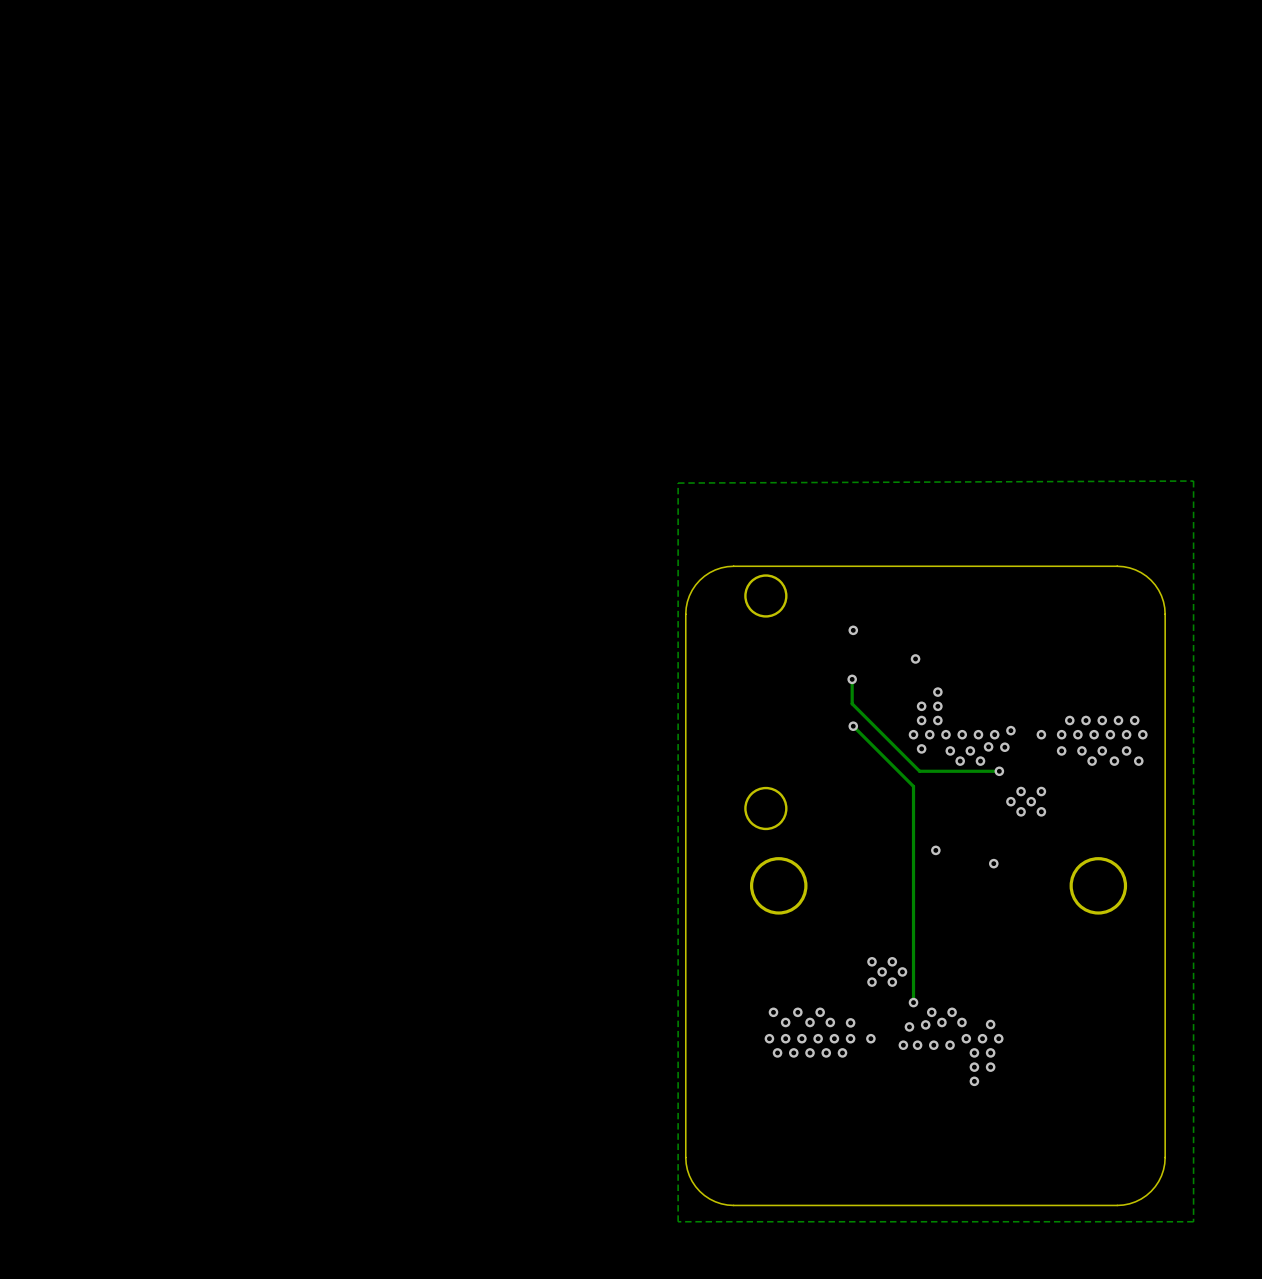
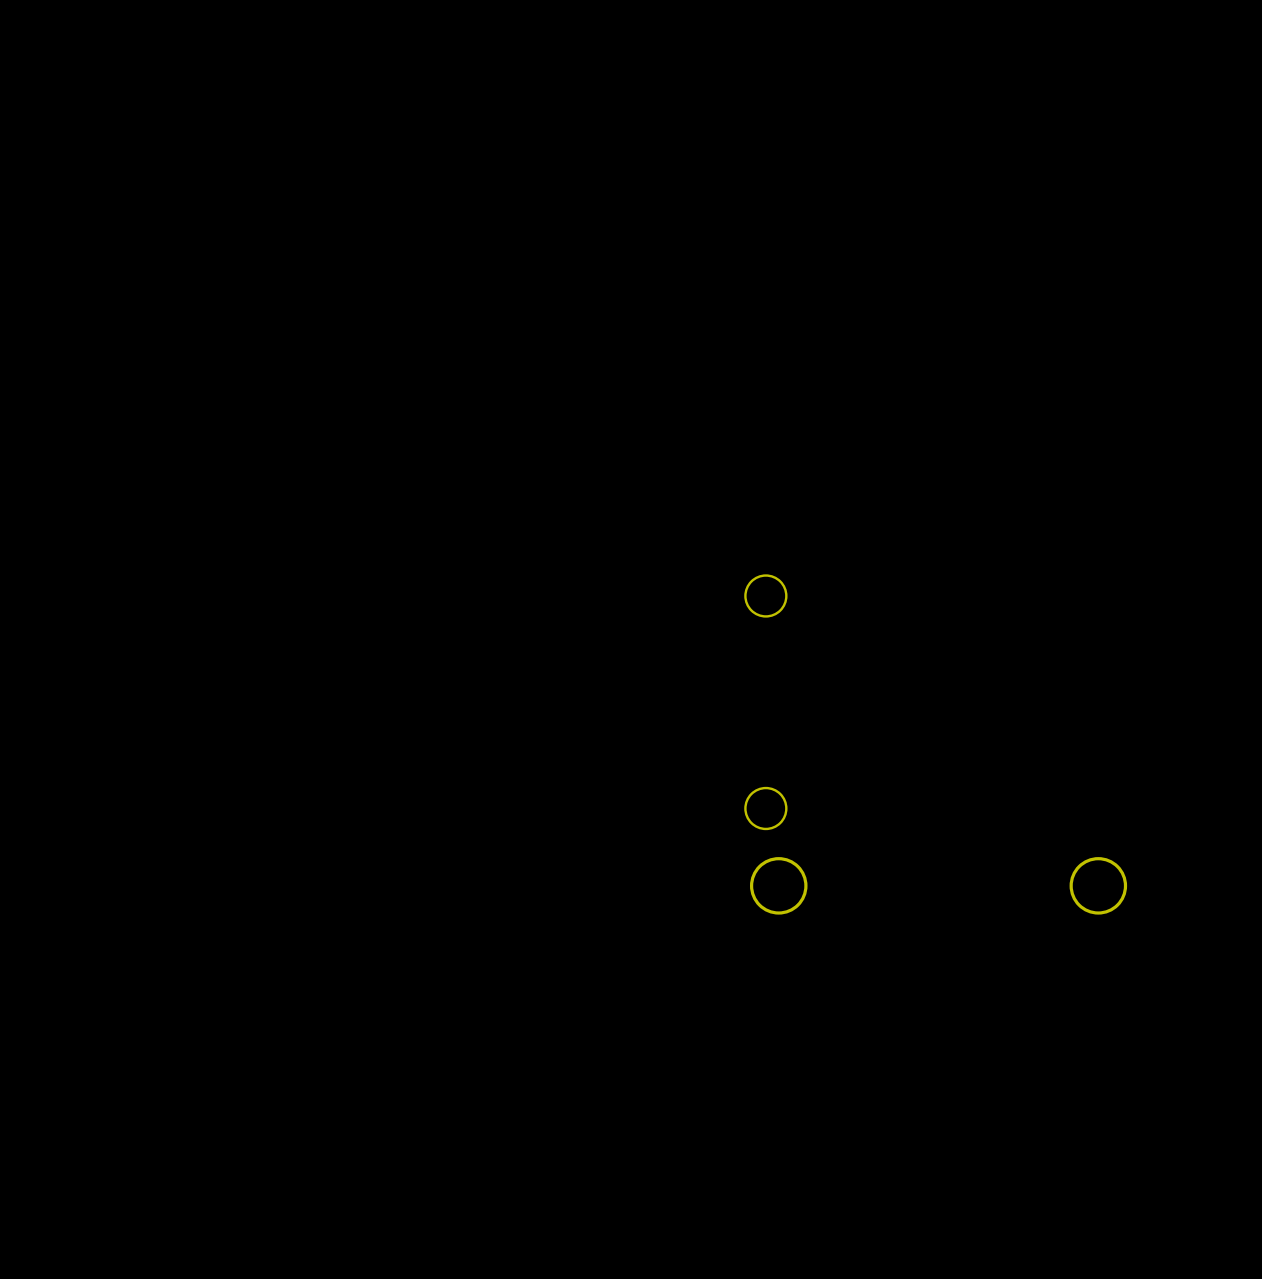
zone outline: (1193, 481) (1193, 1221) (678, 1221) (678, 483) (1193, 481) -> none
board edge: (1117, 566) (733, 566) (721, 567) (709, 572) (699, 580) (692, 590) (687, 601) (685, 614) (685, 1157) (687, 1169) (692, 1181) (699, 1191) (709, 1199) (721, 1203) (733, 1205) (1117, 1205) (1129, 1203) (1141, 1199) (1151, 1191) (1158, 1181) (1163, 1169) (1165, 1157) (1164, 607) (1158, 590) (1146, 576) (1129, 567) (1117, 566) -> none
via: (853, 630) -> none
via: (915, 658) -> none
track: (852, 679) (852, 703) (919, 771) (999, 771) -> none
via: (852, 679) -> none
via: (937, 692) -> none
via: (921, 706) -> none
via: (937, 706) -> none
via: (921, 720) -> none
via: (937, 720) -> none
via: (1069, 720) -> none
via: (1086, 720) -> none
via: (1102, 720) -> none
via: (1118, 720) -> none
via: (1134, 720) -> none
track: (853, 726) (913, 786) (913, 1002) -> none
via: (853, 726) -> none
via: (1010, 730) -> none
via: (913, 734) -> none
via: (929, 734) -> none
via: (945, 734) -> none
via: (962, 734) -> none
via: (978, 734) -> none
via: (994, 734) -> none
via: (1041, 734) -> none
via: (1061, 734) -> none
via: (1077, 734) -> none
via: (1094, 734) -> none
via: (1110, 734) -> none
via: (1126, 734) -> none
via: (1142, 734) -> none
via: (988, 746) -> none
via: (1004, 747) -> none
via: (921, 748) -> none
via: (950, 750) -> none
via: (970, 750) -> none
via: (1061, 750) -> none
via: (1081, 750) -> none
via: (1102, 750) -> none
via: (1126, 750) -> none
via: (960, 761) -> none
via: (980, 761) -> none
via: (1092, 761) -> none
via: (1114, 761) -> none
via: (1138, 761) -> none
via: (999, 771) -> none
via: (1021, 791) -> none
via: (1041, 791) -> none
via: (1010, 801) -> none
via: (1031, 801) -> none
via: (1021, 811) -> none
via: (1041, 811) -> none
via: (935, 850) -> none
via: (993, 863) -> none
via: (872, 961) -> none
via: (892, 961) -> none
via: (882, 971) -> none
via: (902, 971) -> none
via: (872, 982) -> none
via: (892, 982) -> none
via: (913, 1002) -> none
via: (773, 1012) -> none
via: (797, 1012) -> none
via: (820, 1012) -> none
via: (931, 1012) -> none
via: (952, 1012) -> none
via: (785, 1022) -> none
via: (810, 1022) -> none
via: (830, 1022) -> none
via: (850, 1022) -> none
via: (941, 1022) -> none
via: (961, 1022) -> none
via: (925, 1024) -> none
via: (990, 1024) -> none
via: (909, 1026) -> none
via: (769, 1038) -> none
via: (785, 1038) -> none
via: (801, 1038) -> none
via: (818, 1038) -> none
via: (834, 1038) -> none
via: (850, 1038) -> none
via: (870, 1038) -> none
via: (966, 1038) -> none
via: (982, 1038) -> none
via: (998, 1038) -> none
via: (903, 1045) -> none
via: (917, 1045) -> none
via: (933, 1045) -> none
via: (950, 1045) -> none
via: (777, 1052) -> none
via: (793, 1052) -> none
via: (810, 1052) -> none
via: (826, 1052) -> none
via: (842, 1052) -> none
via: (974, 1052) -> none
via: (990, 1052) -> none
via: (974, 1067) -> none
via: (990, 1067) -> none
via: (974, 1081) -> none

